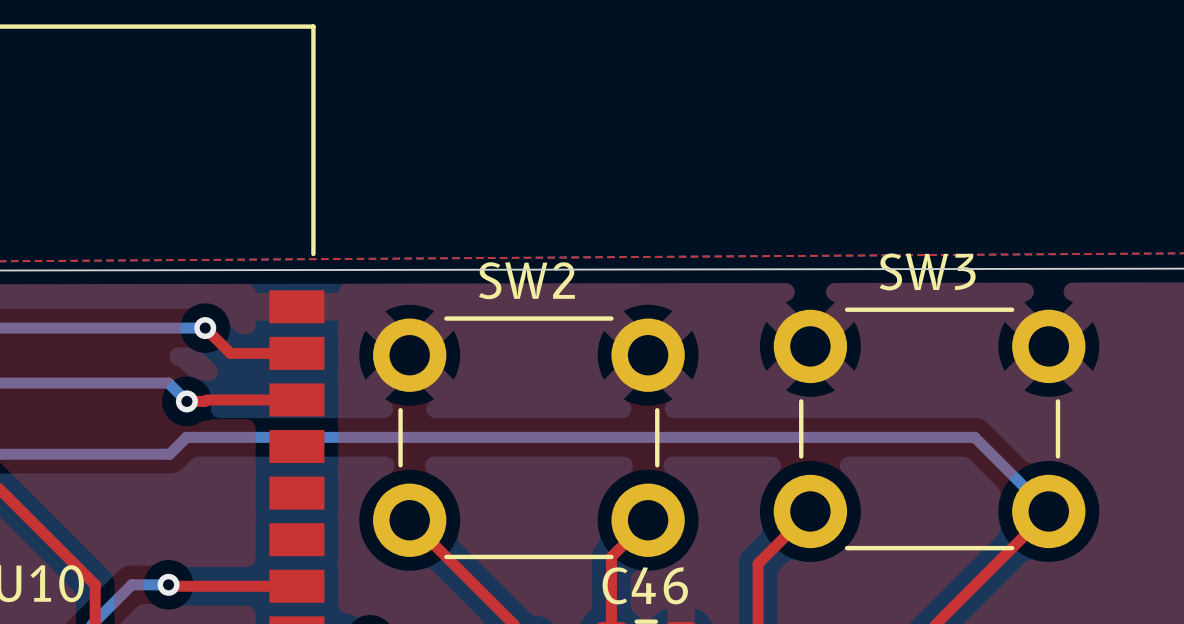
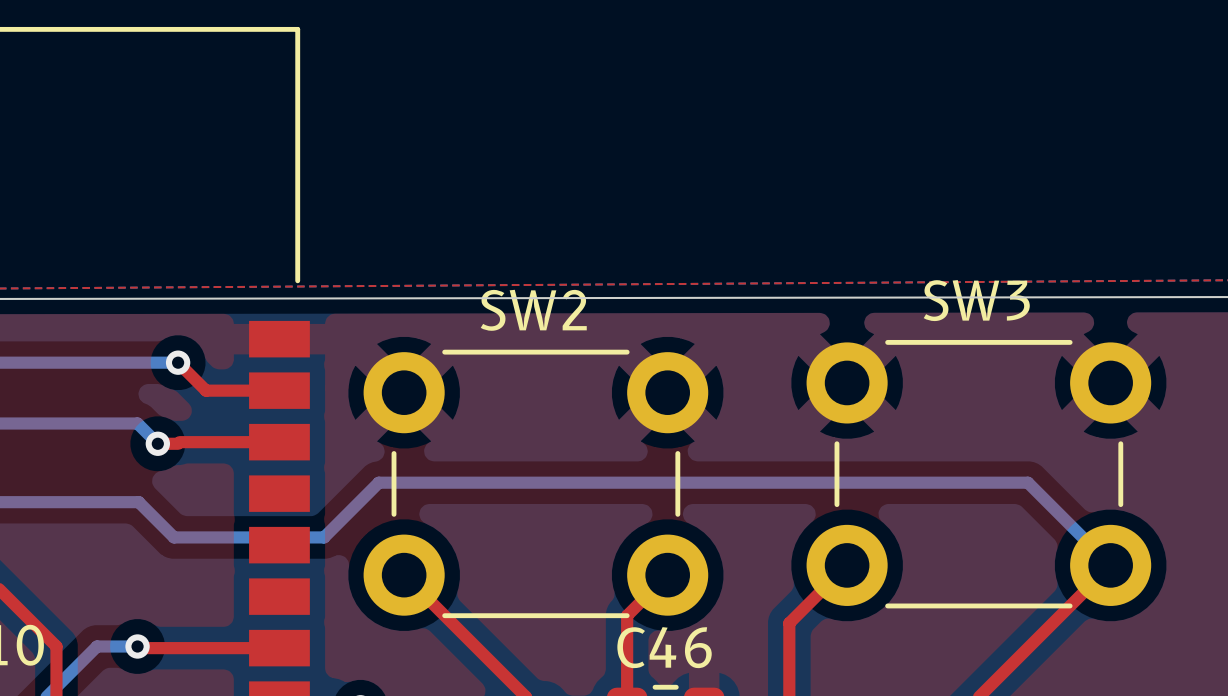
bottom track: (974, 437) (186, 437) (169, 454) -> (1028, 483) (378, 482) (324, 537) (174, 537) (138, 502)

